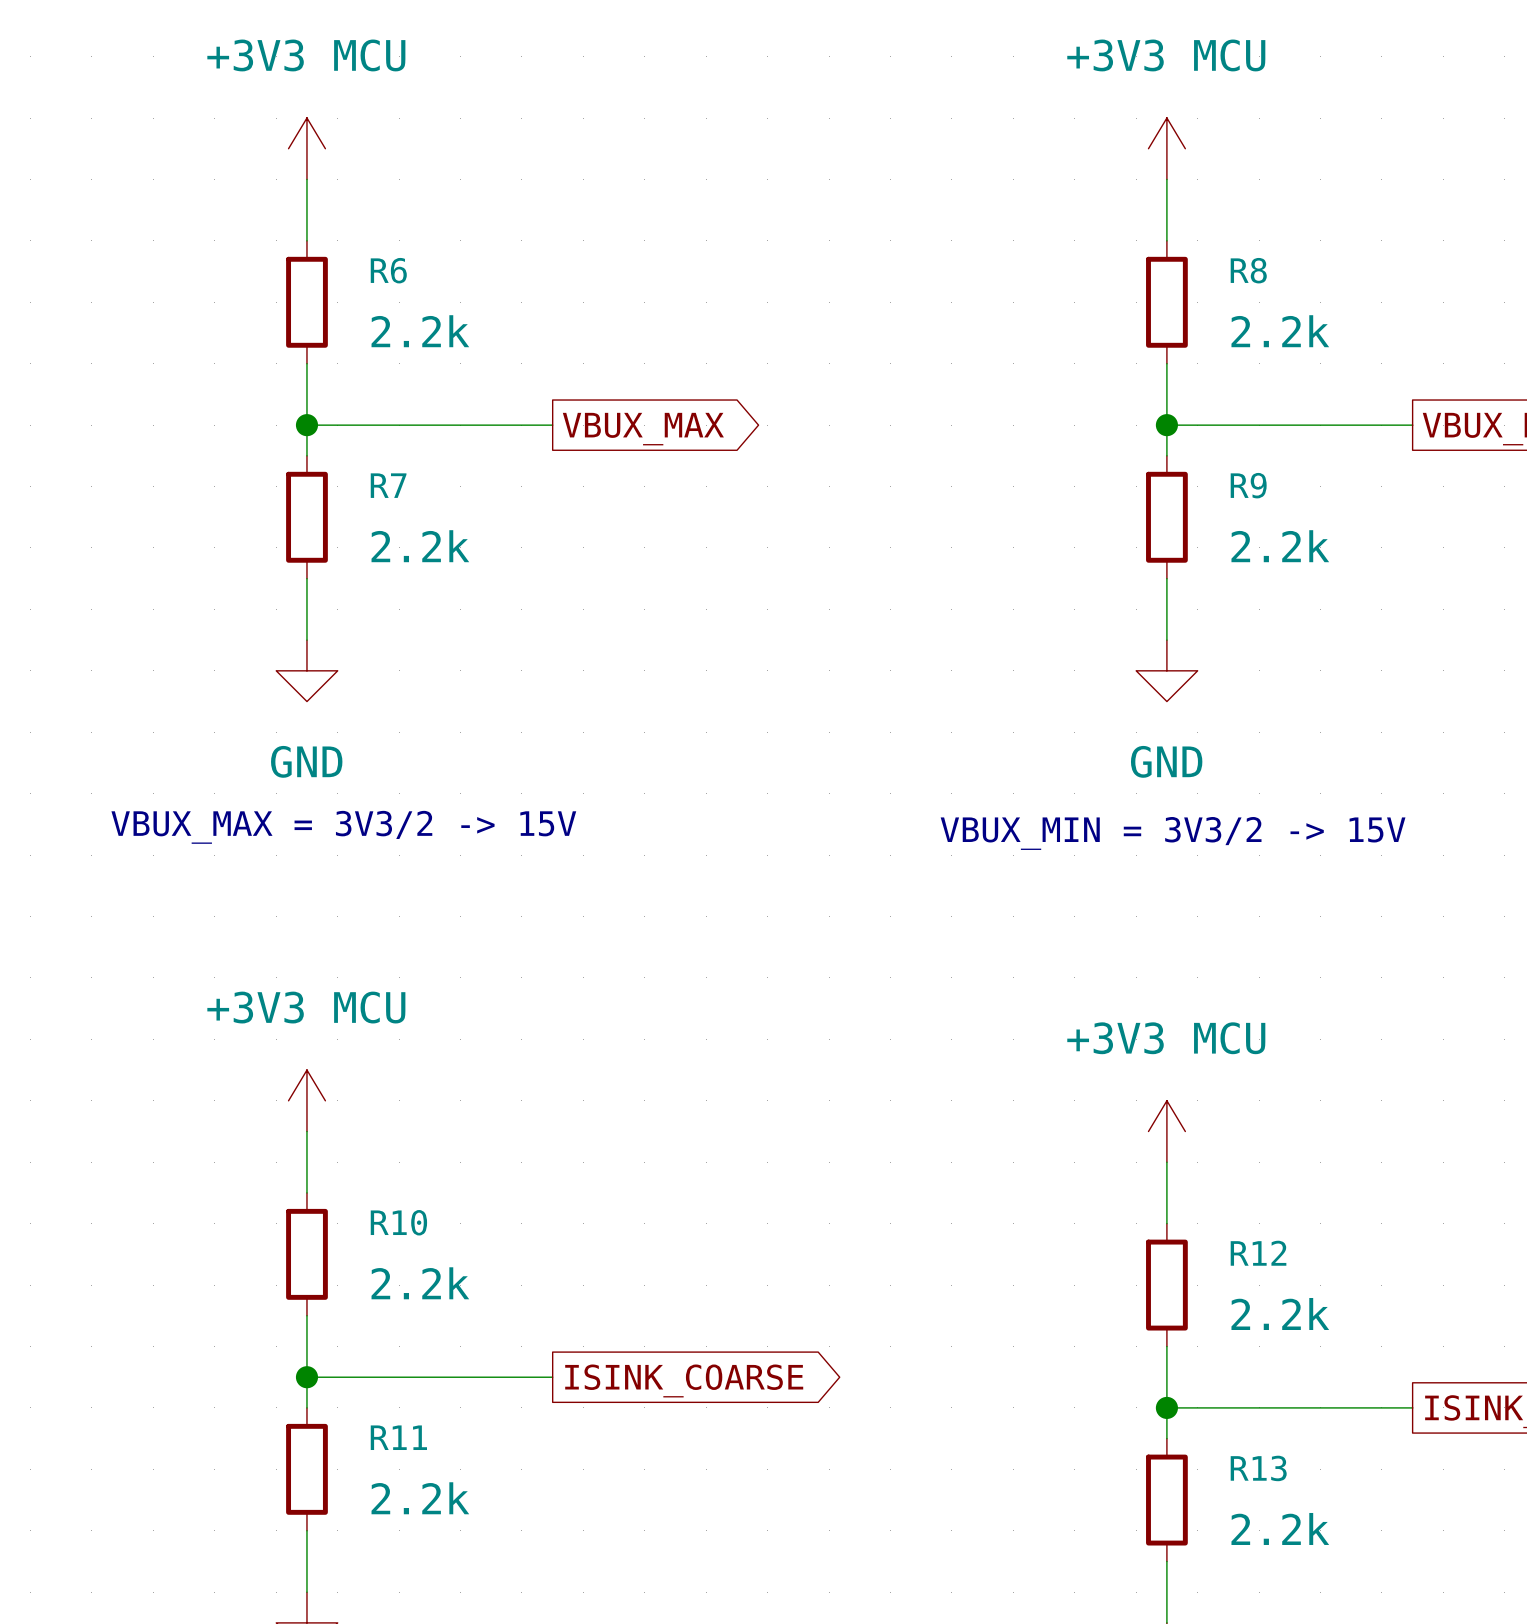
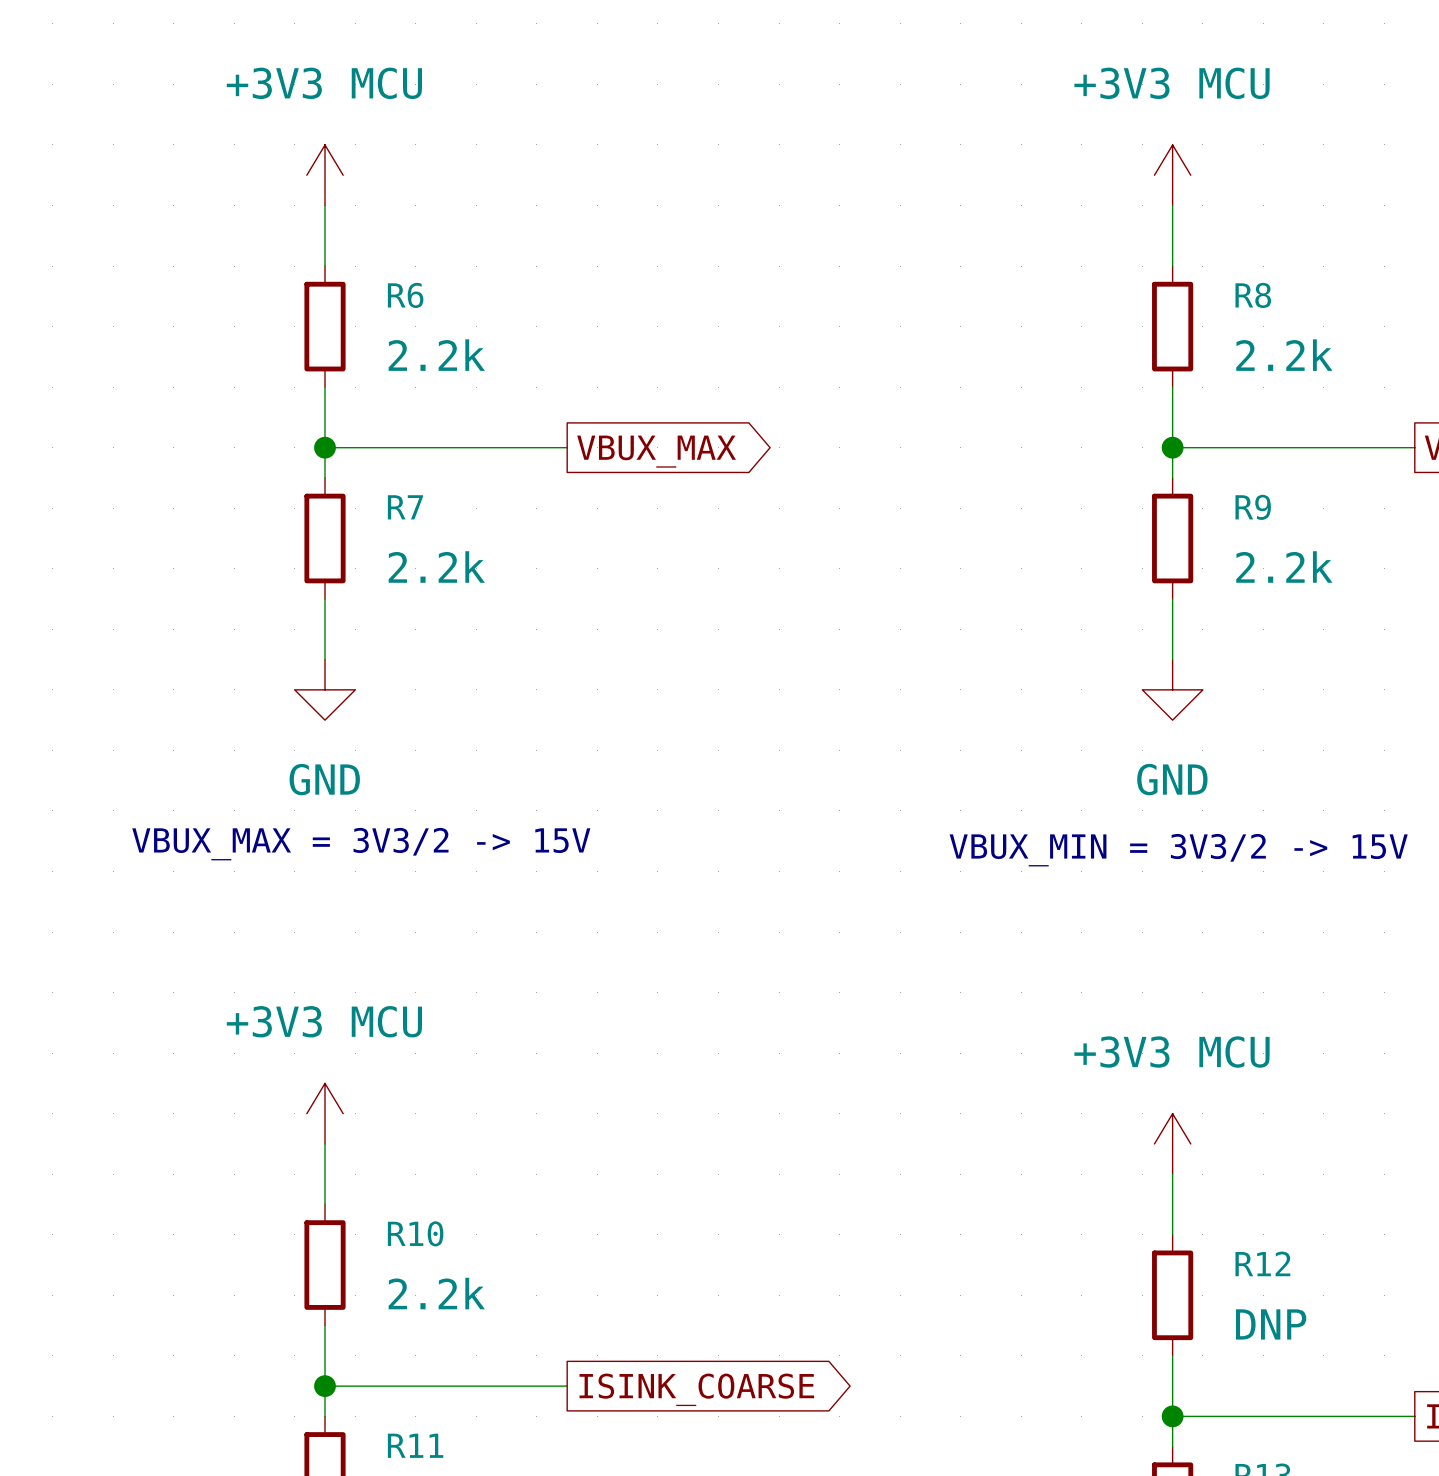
R12 value: 2.2k (1280, 1313) -> DNP (1271, 1324)

